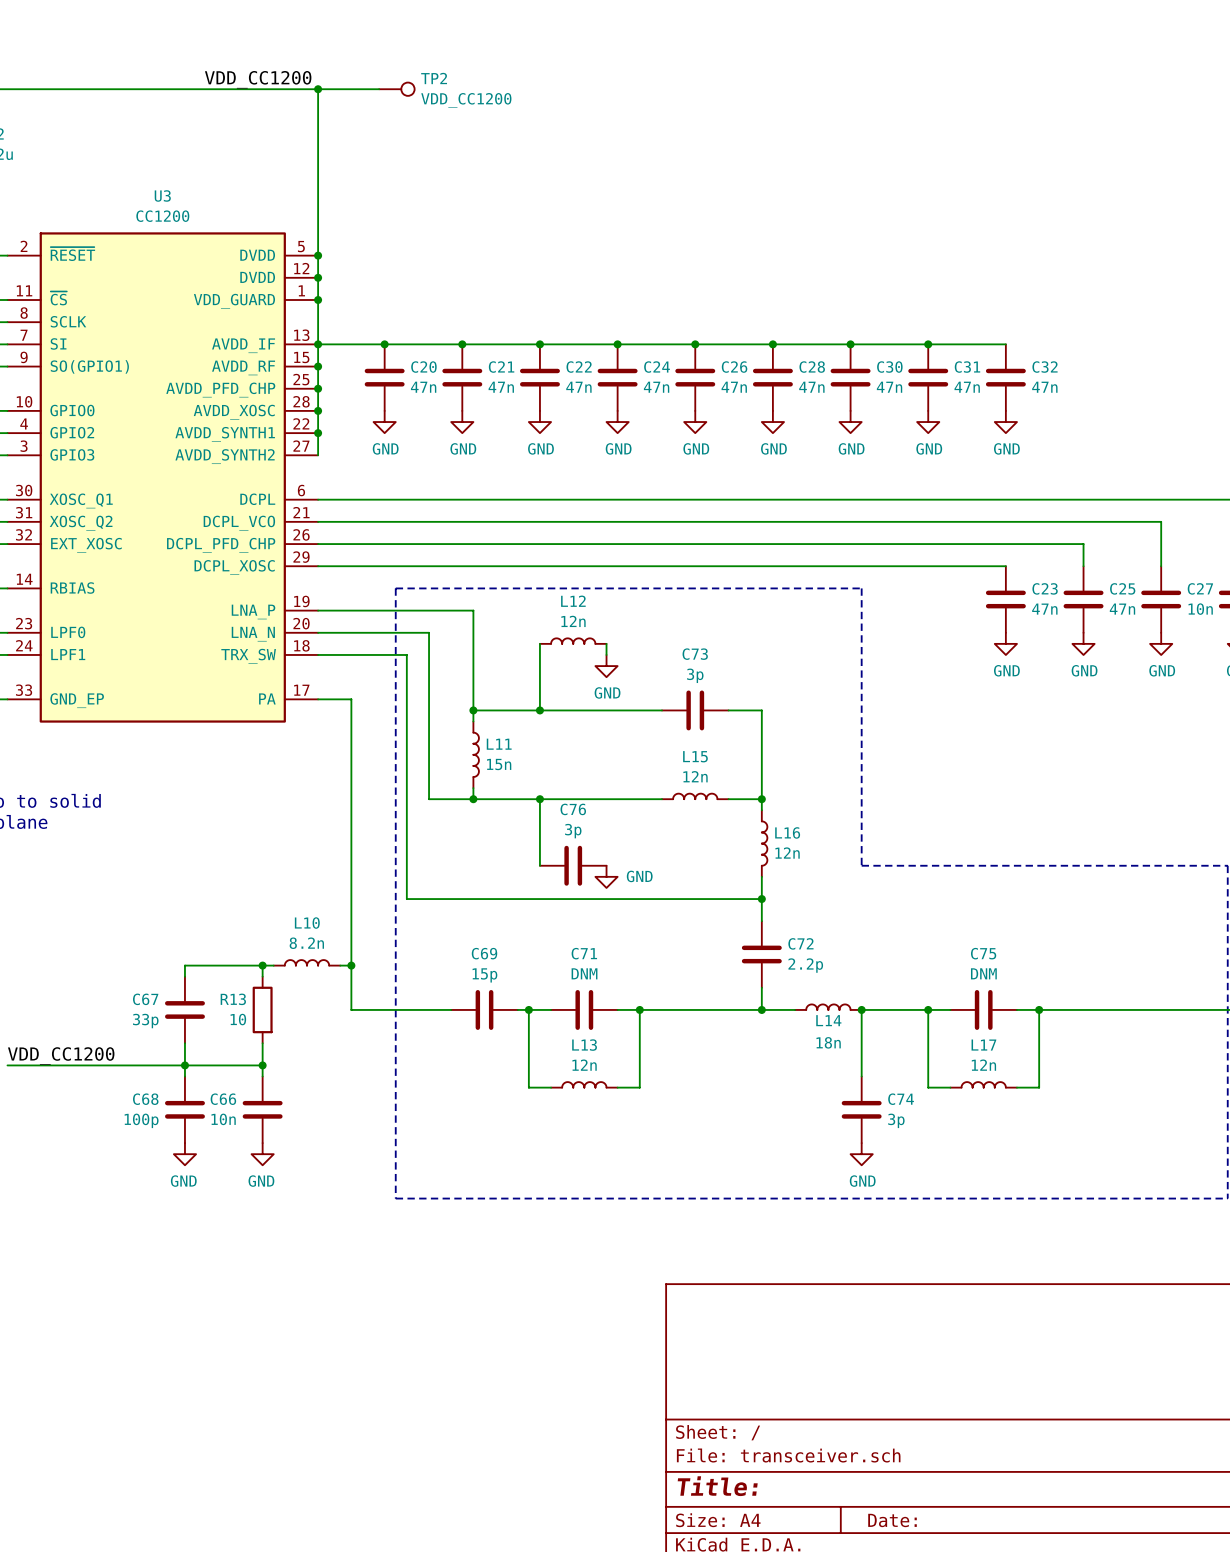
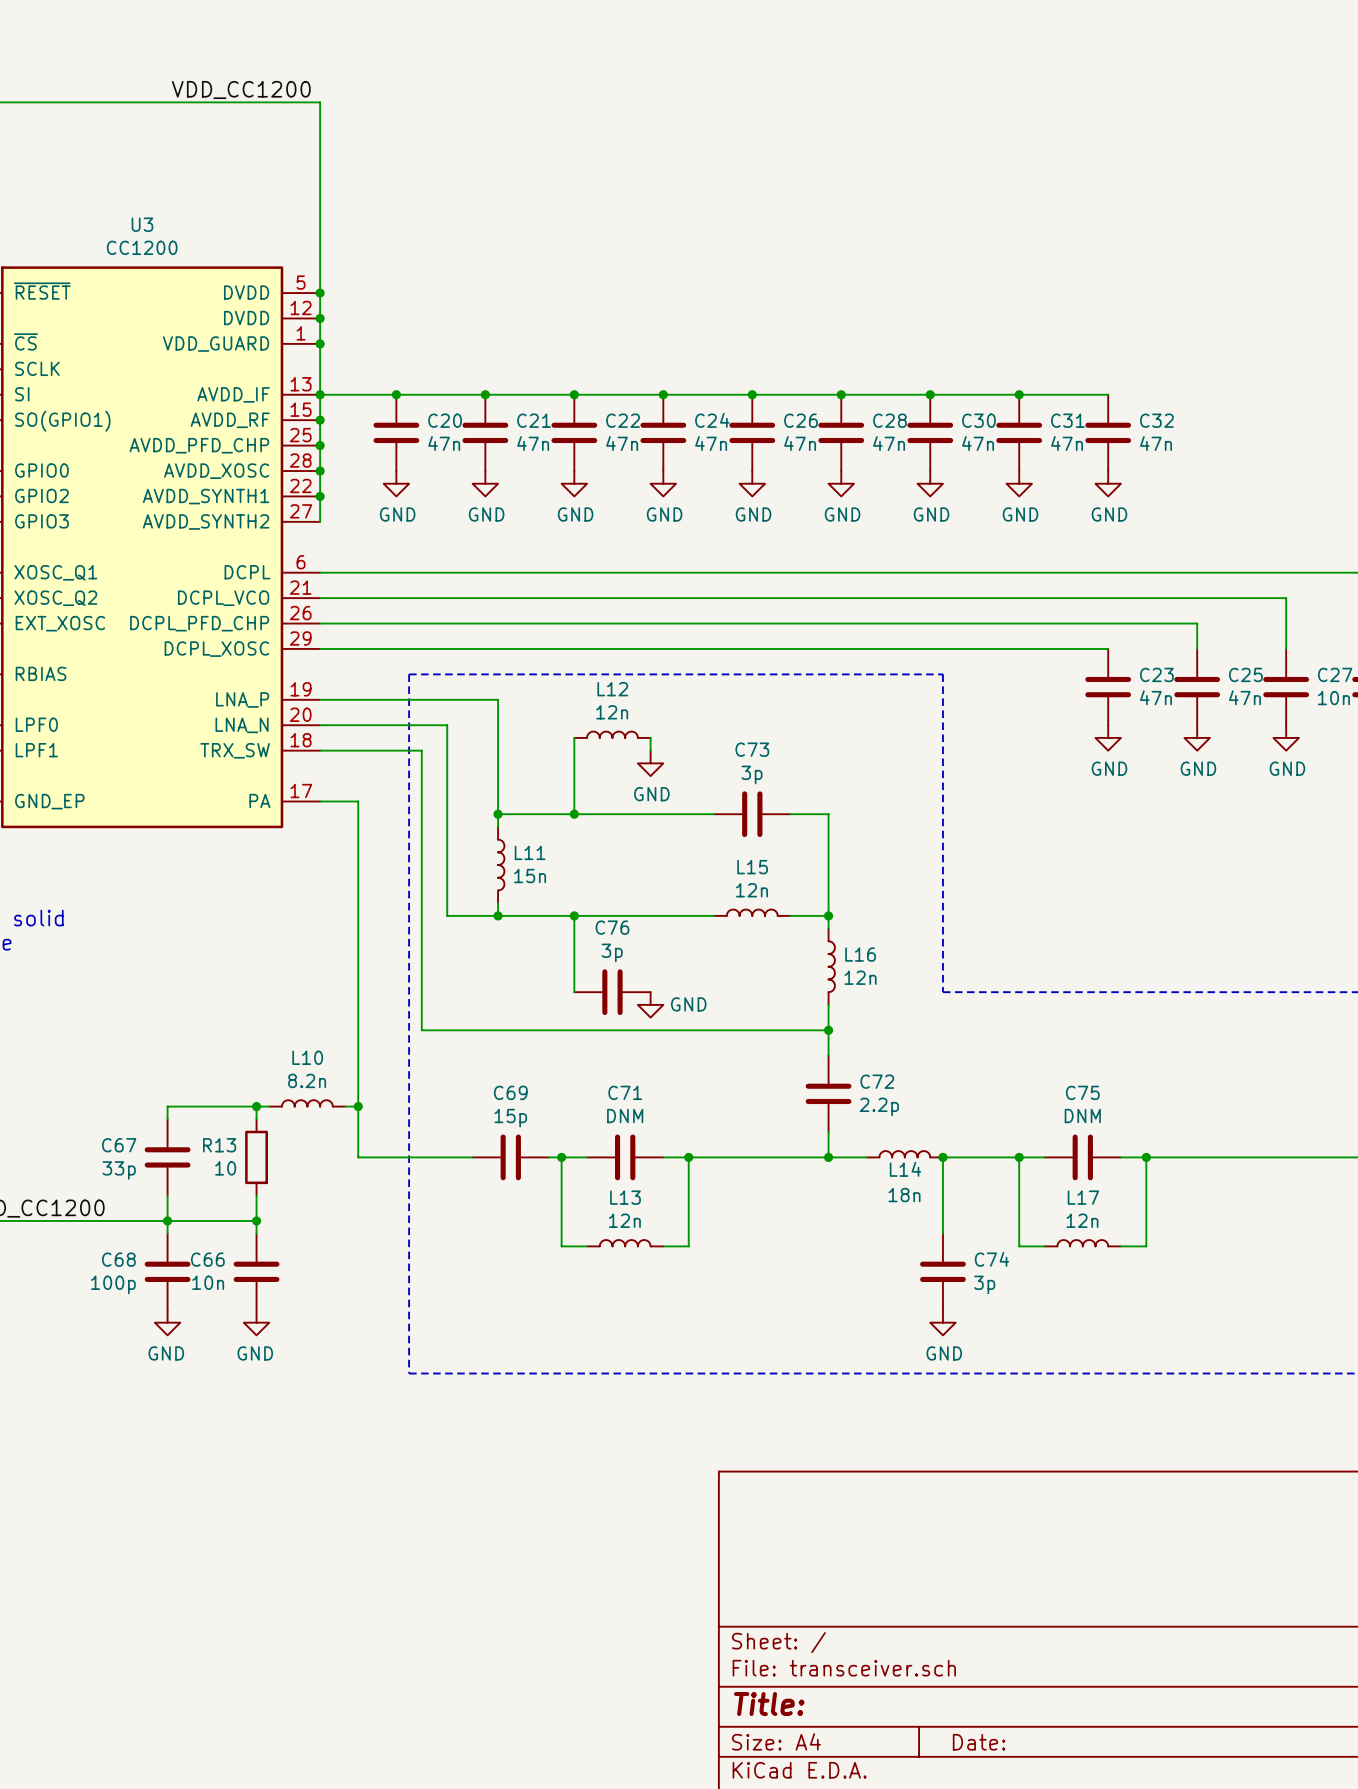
wire: (318, 89) (379, 89) -> none
junction: (318, 89) -> none
TP2: VDD_CC1200 (396, 89) -> none

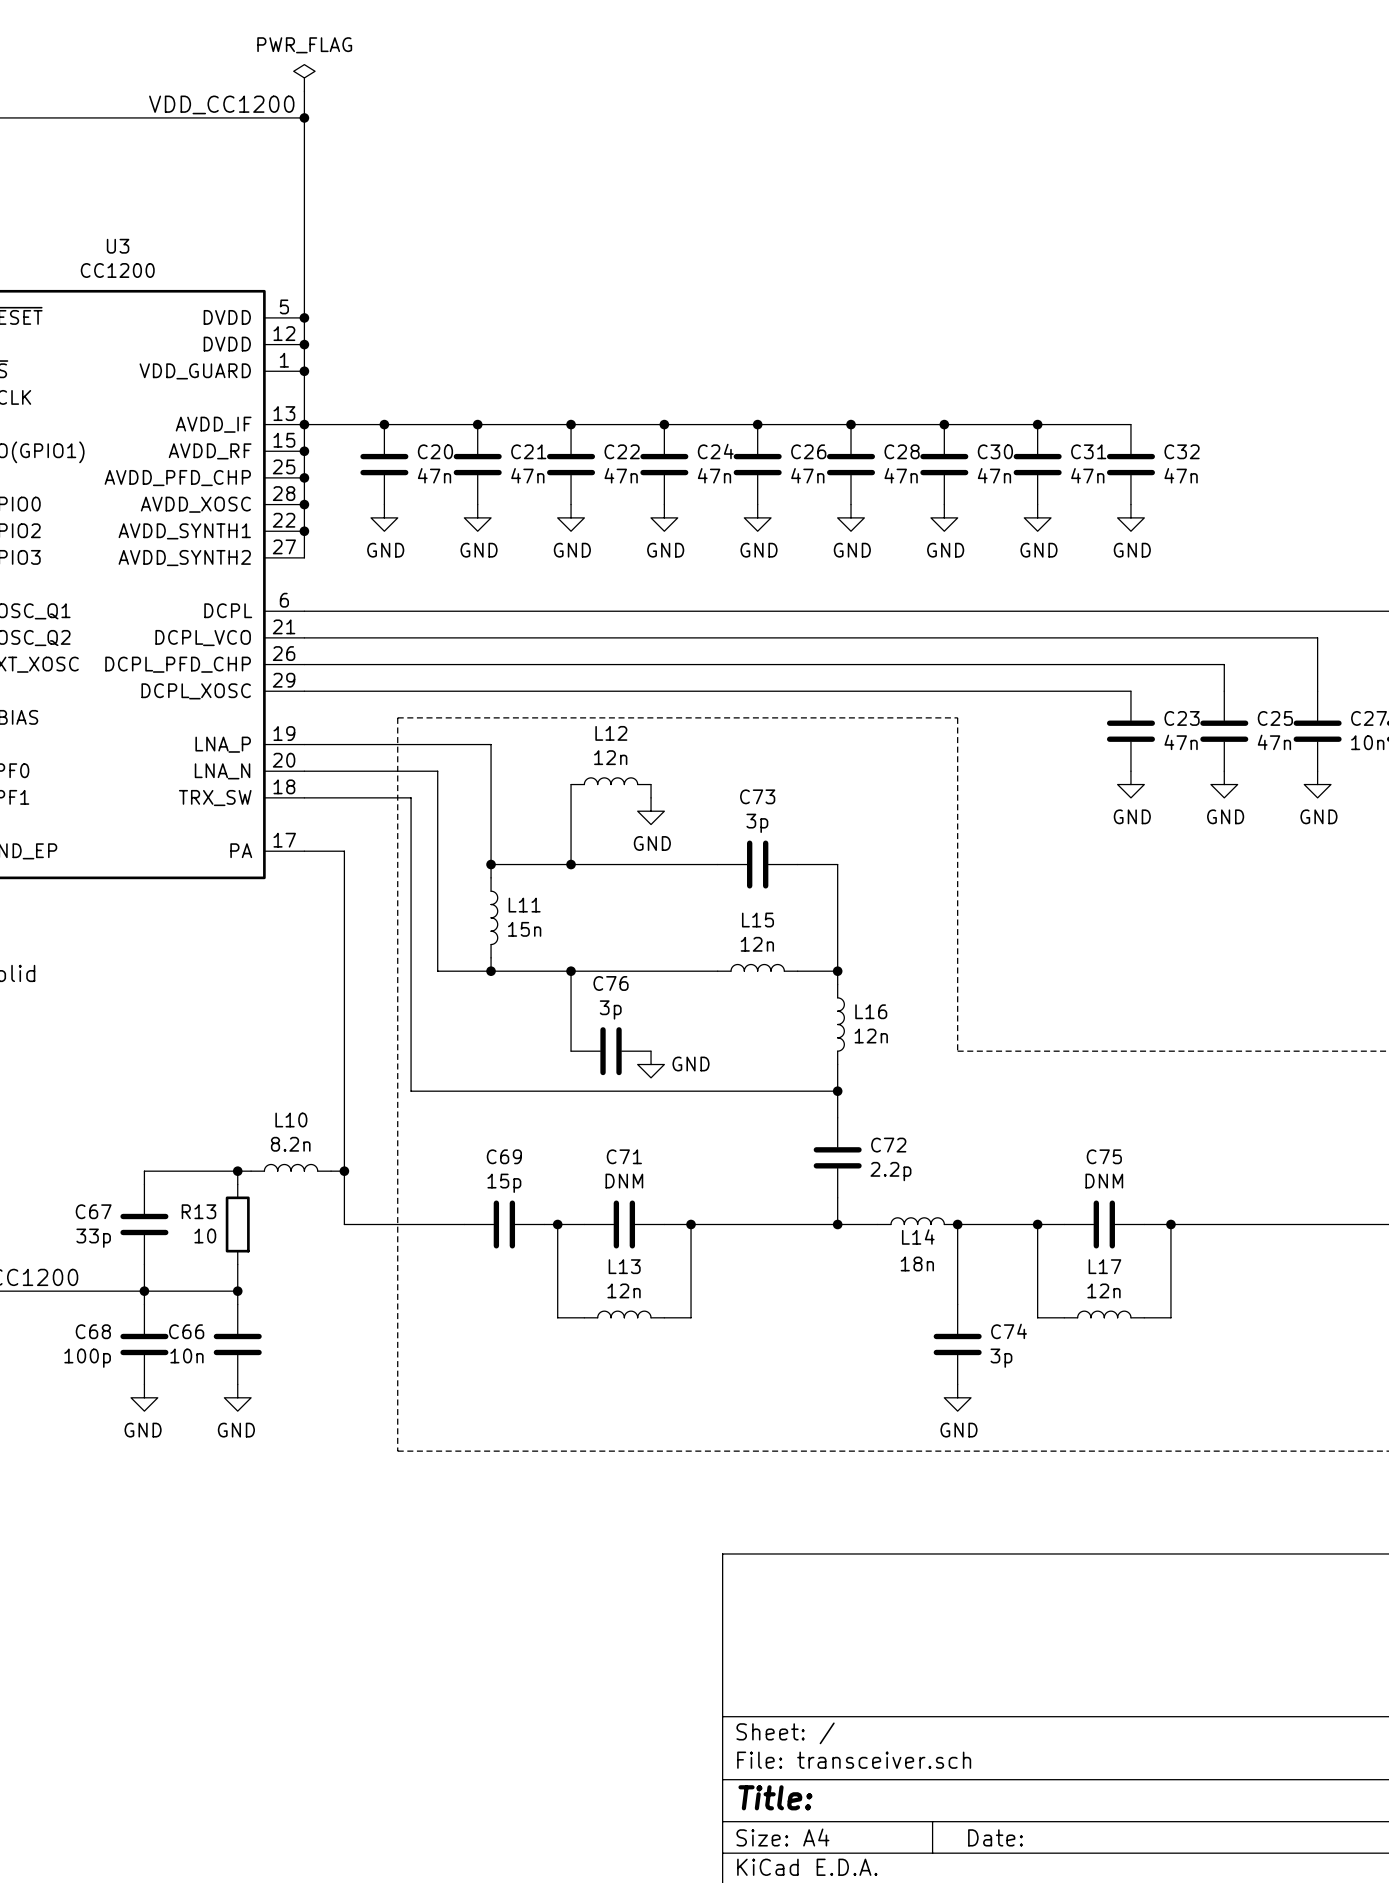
power symbol: none -> PWR_FLAG (304, 77)
wire: none -> (304, 91) (304, 117)
junction: none -> (304, 117)

